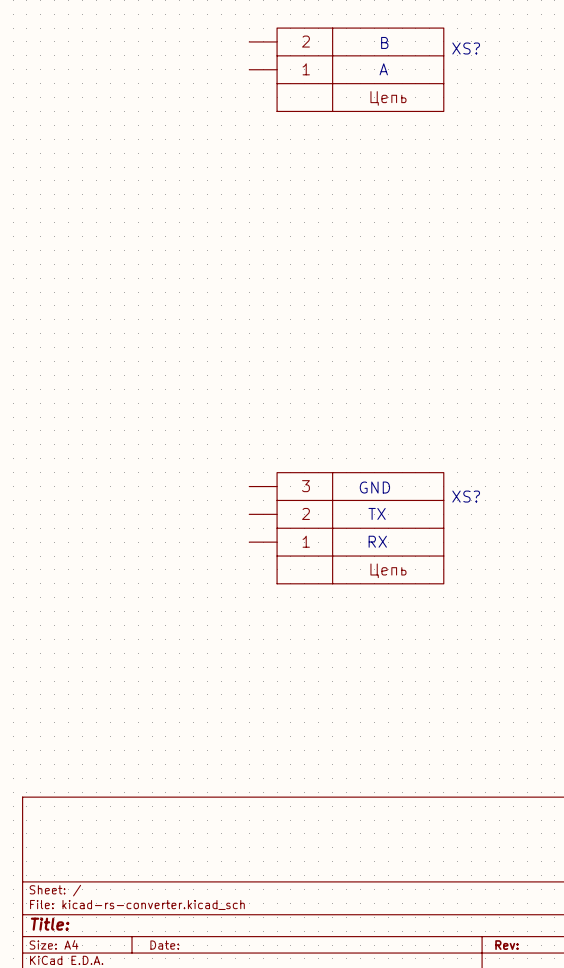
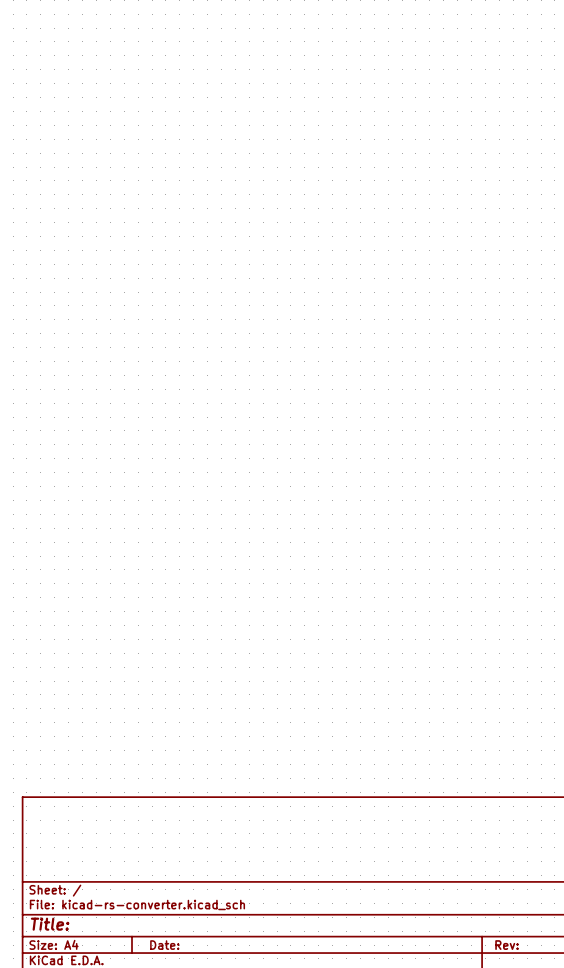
XS?: (346, 69) -> none
XS?: (346, 528) -> none

